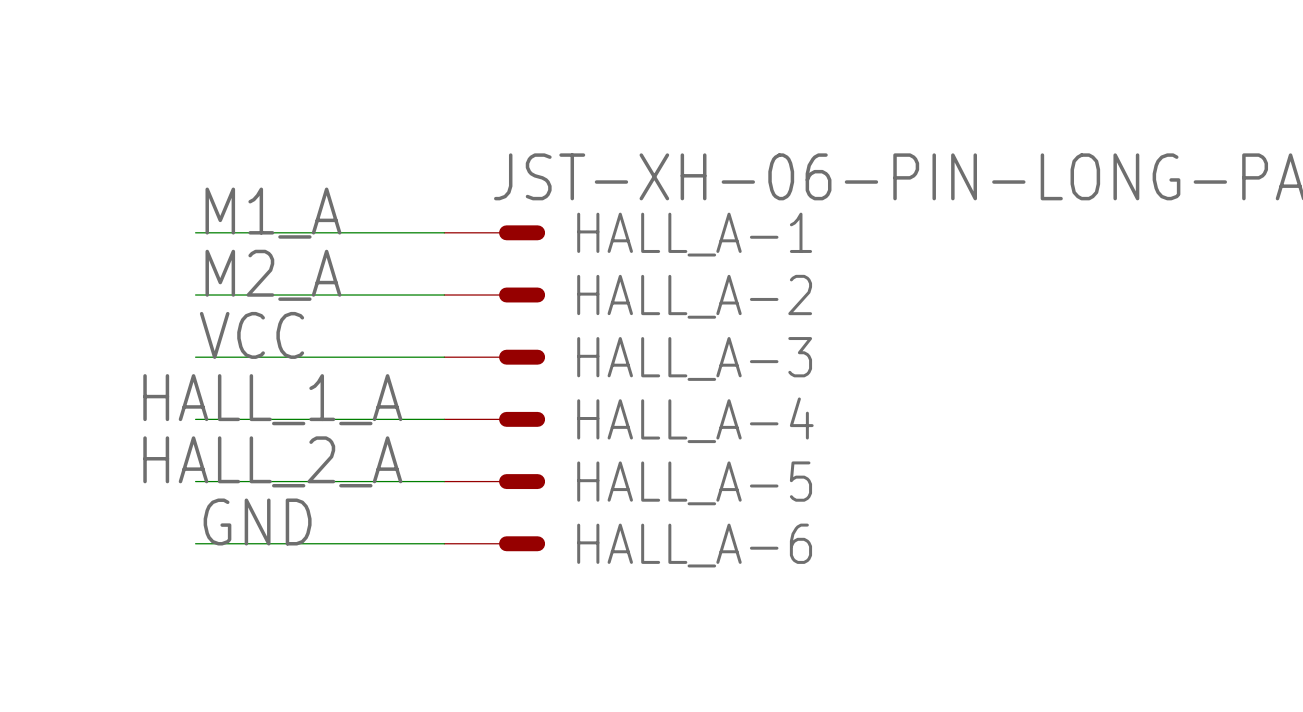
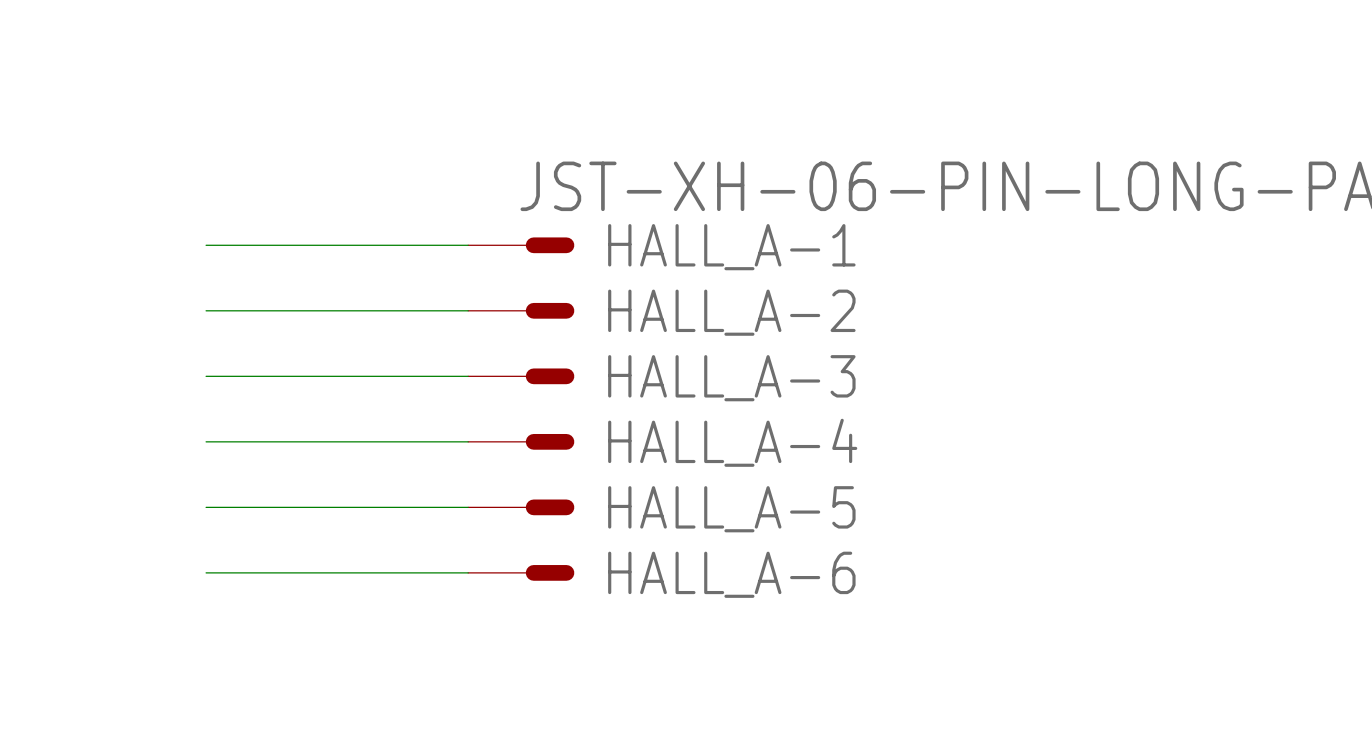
label: M1_A (273, 213) -> none
label: M2_A (273, 275) -> none
label: VCC (252, 335) -> none
label: HALL_1_A (272, 399) -> none
label: HALL_2_A (272, 461) -> none
label: GND (257, 521) -> none

